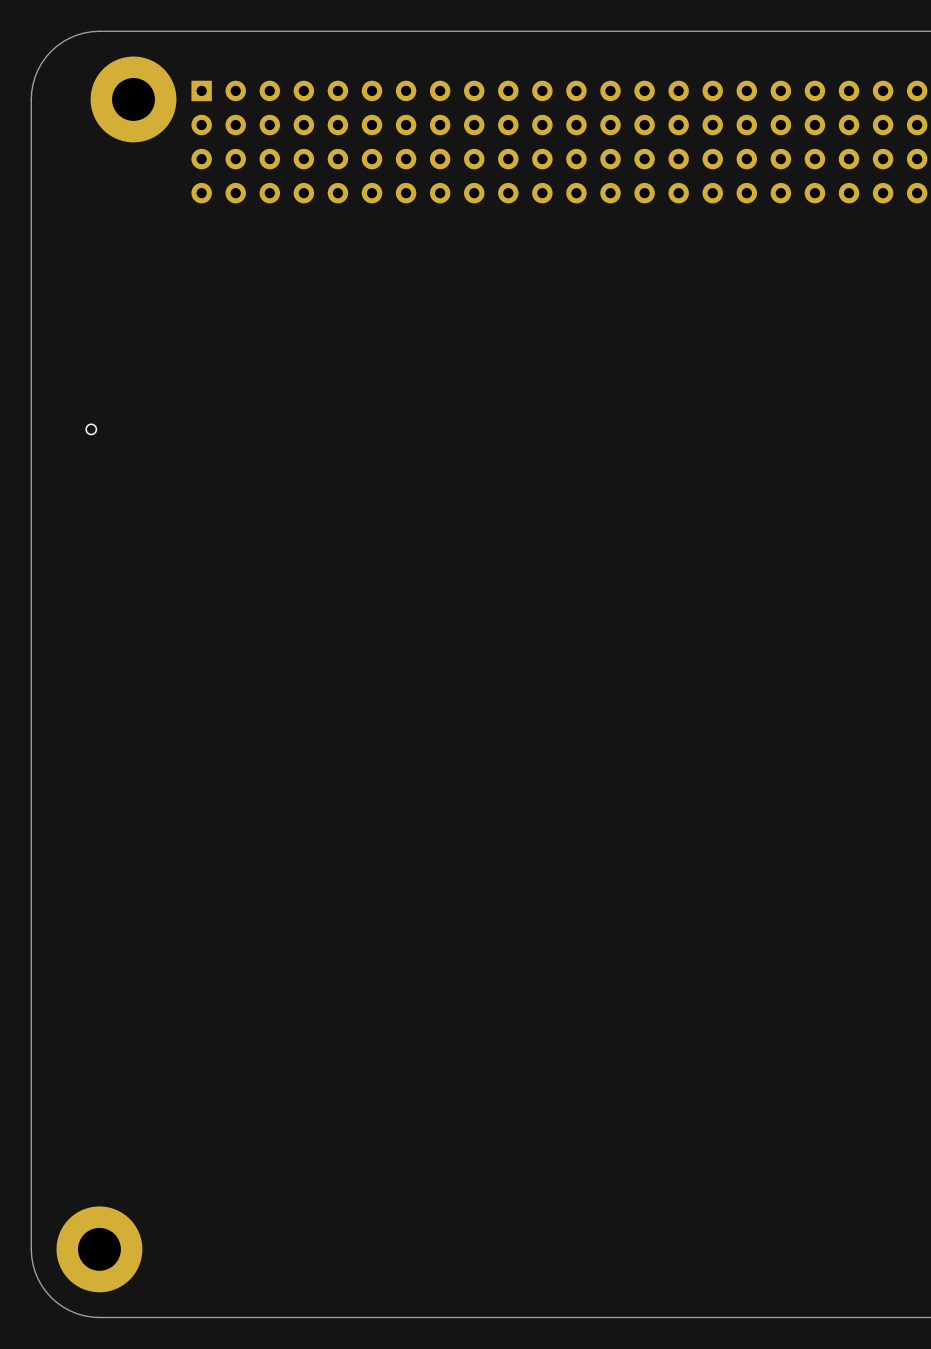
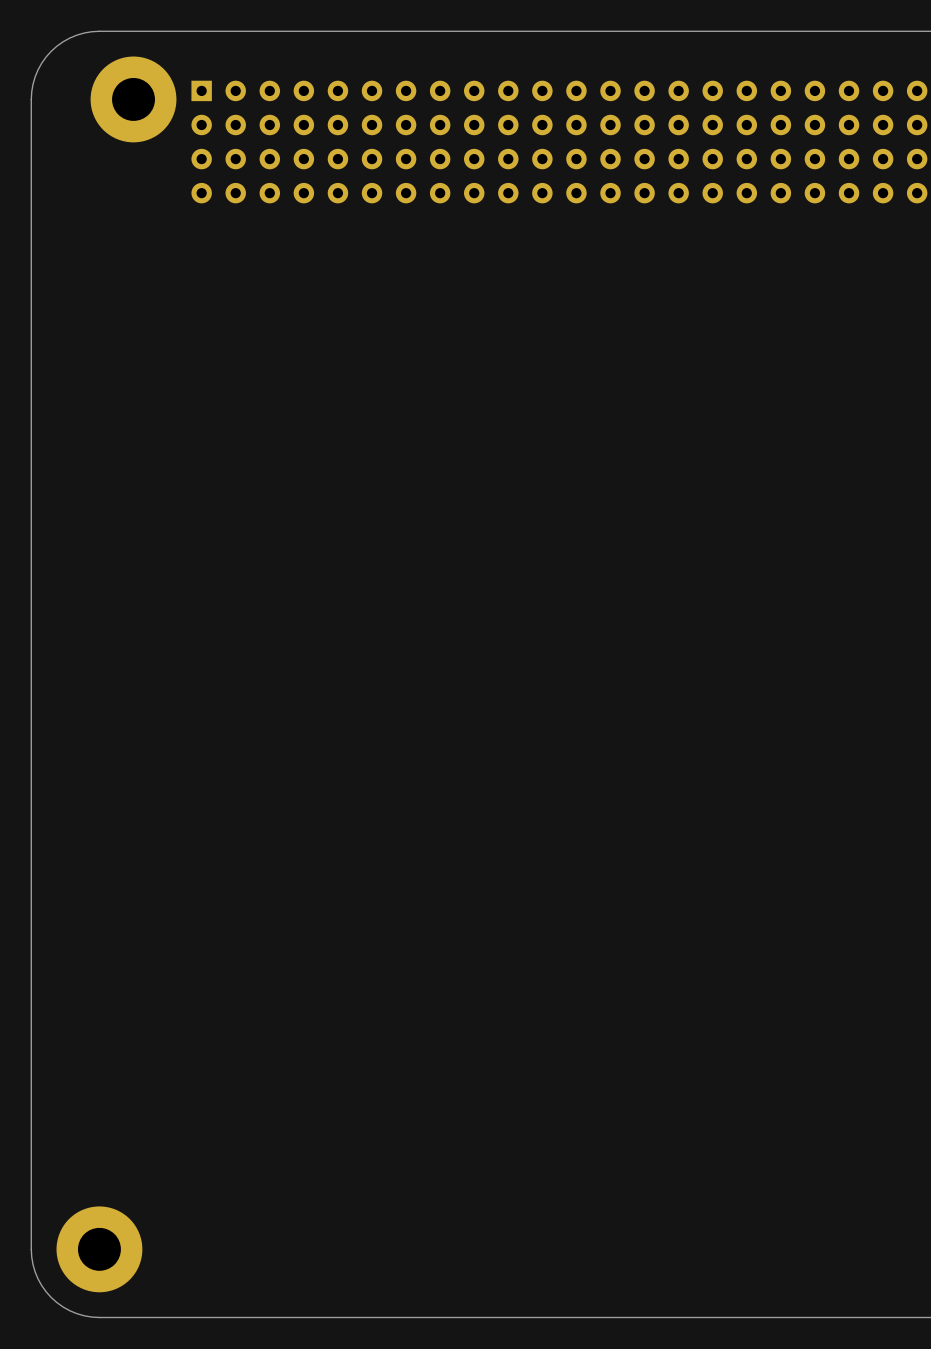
part: (91, 429) -> none

